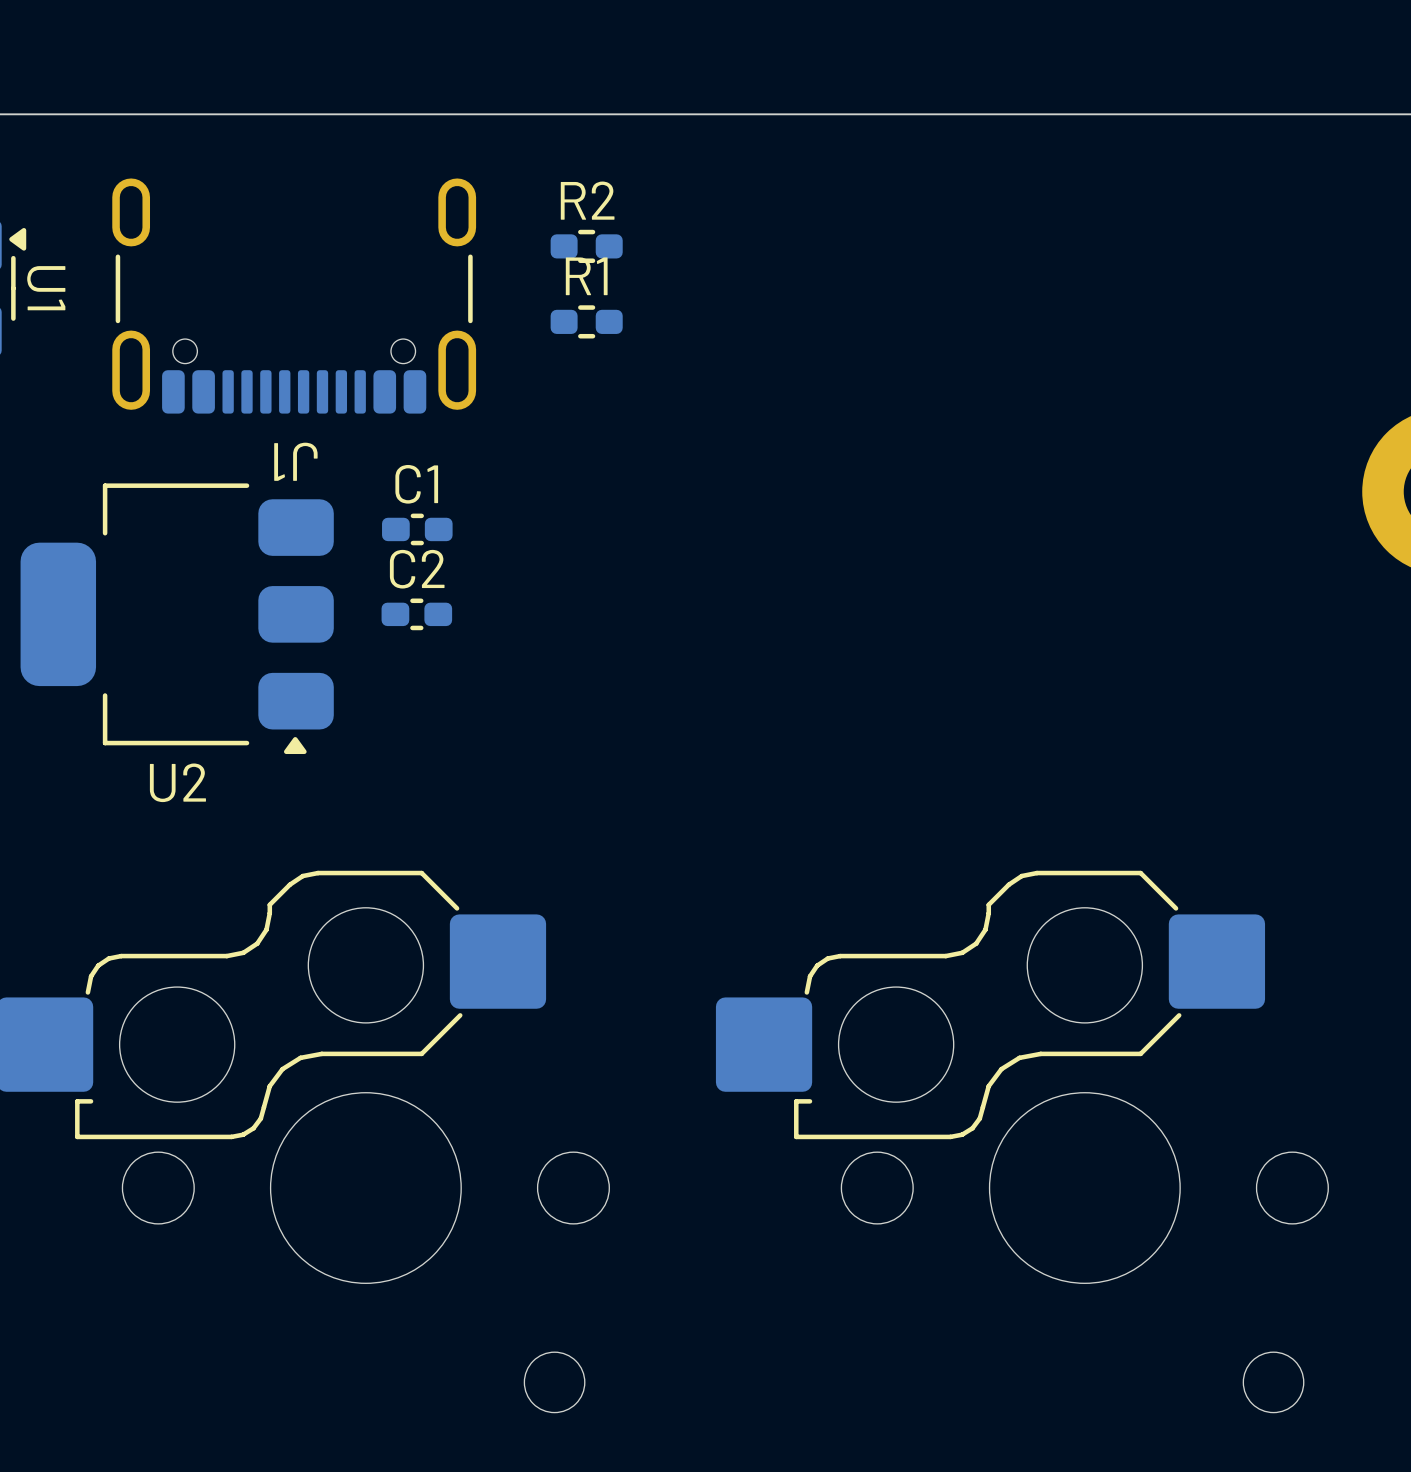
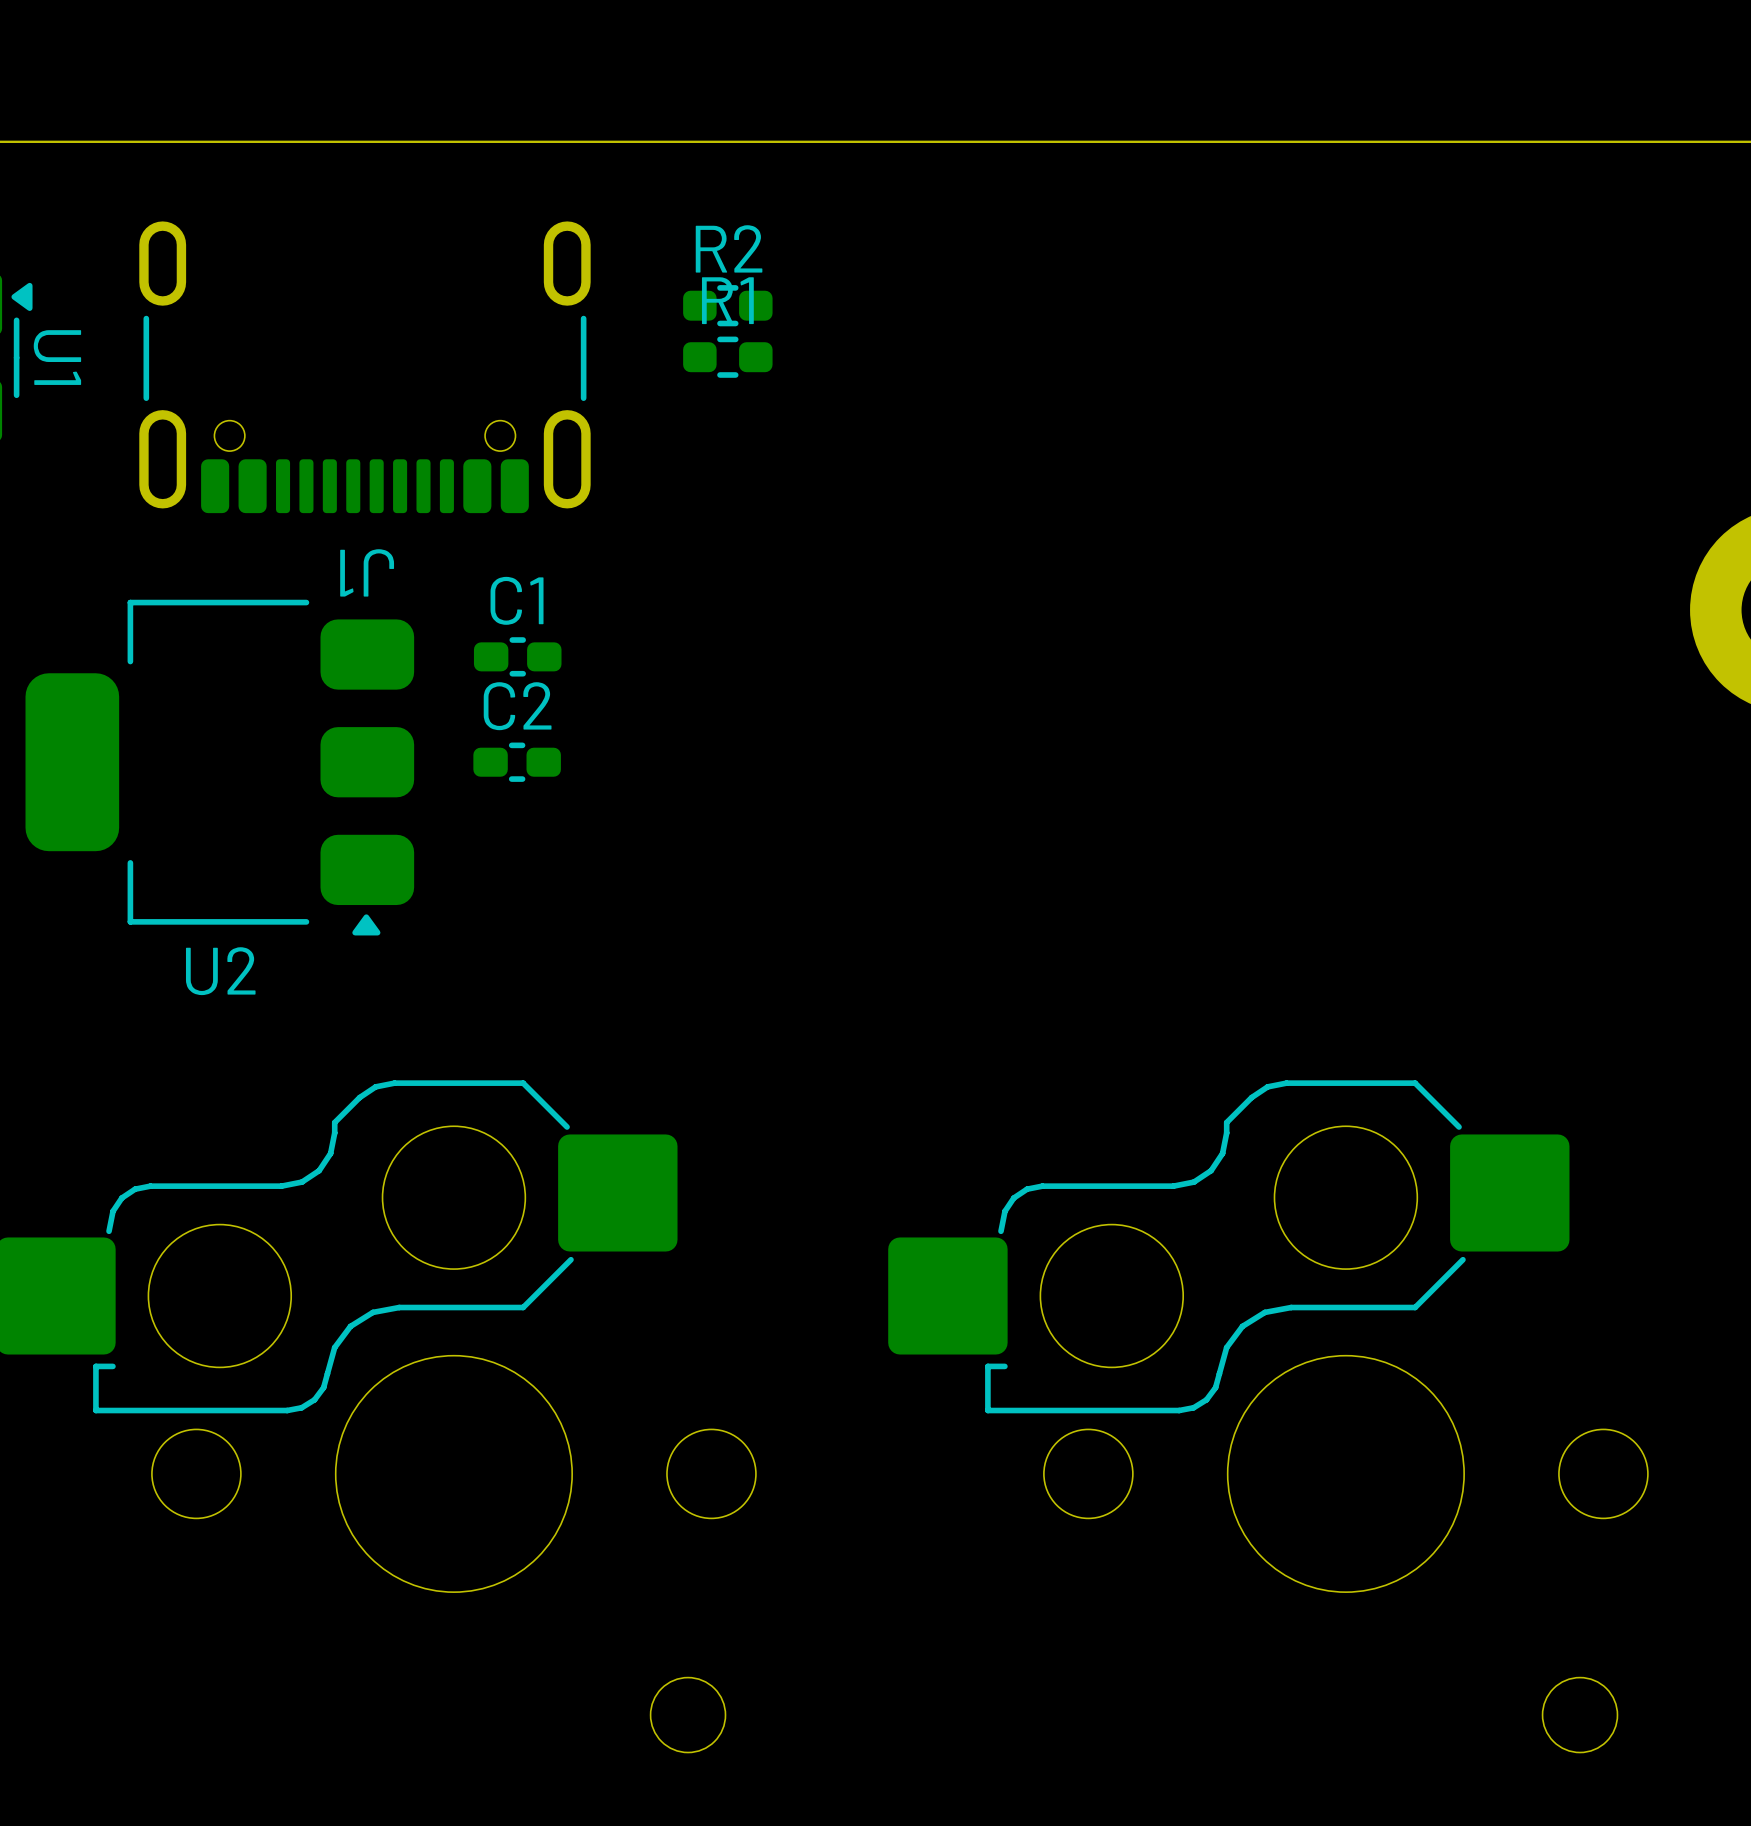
R1 position: (586, 321) -> (727, 357)

